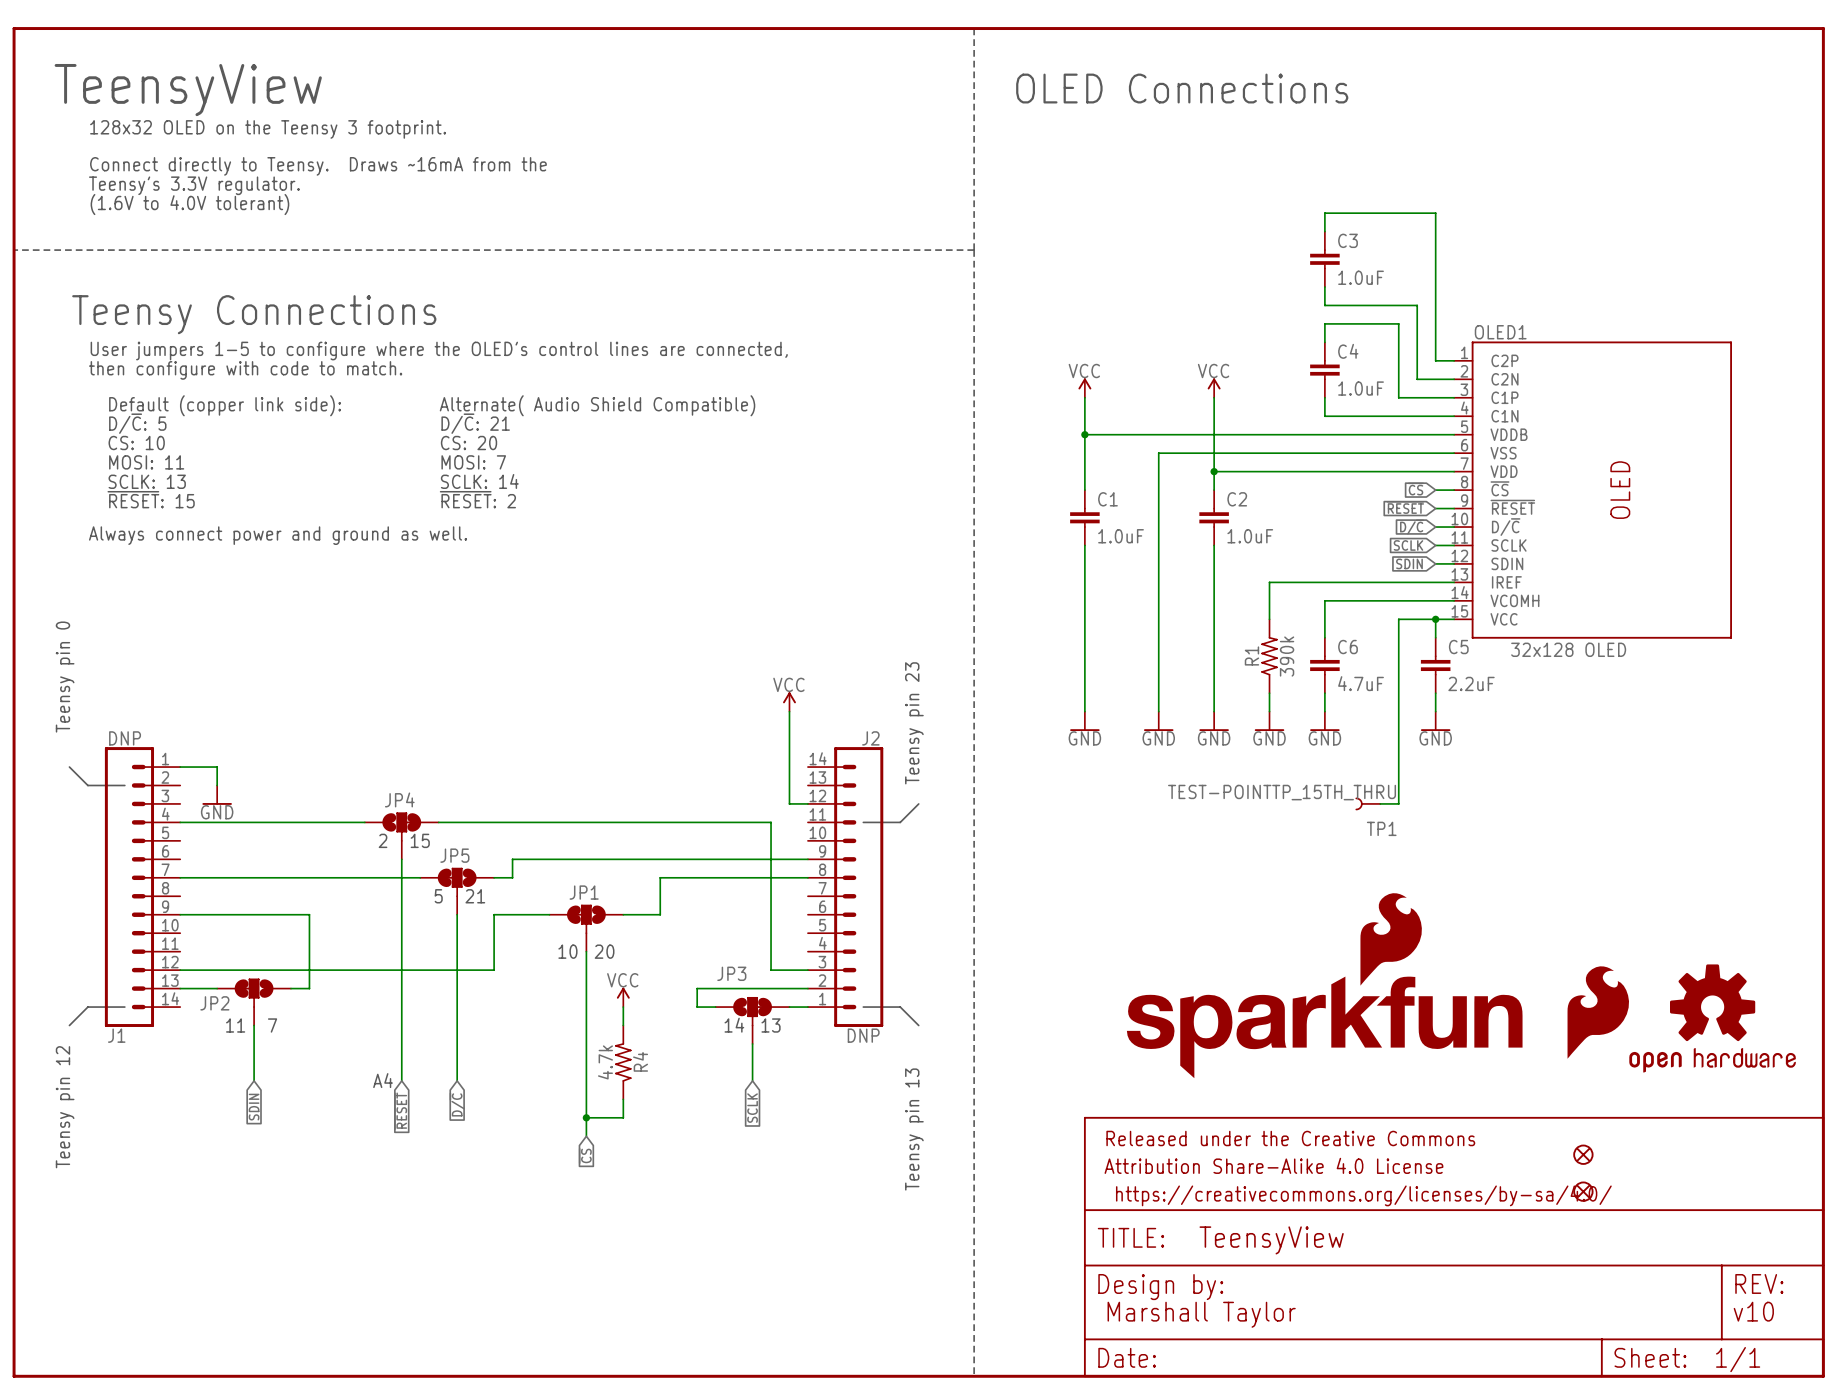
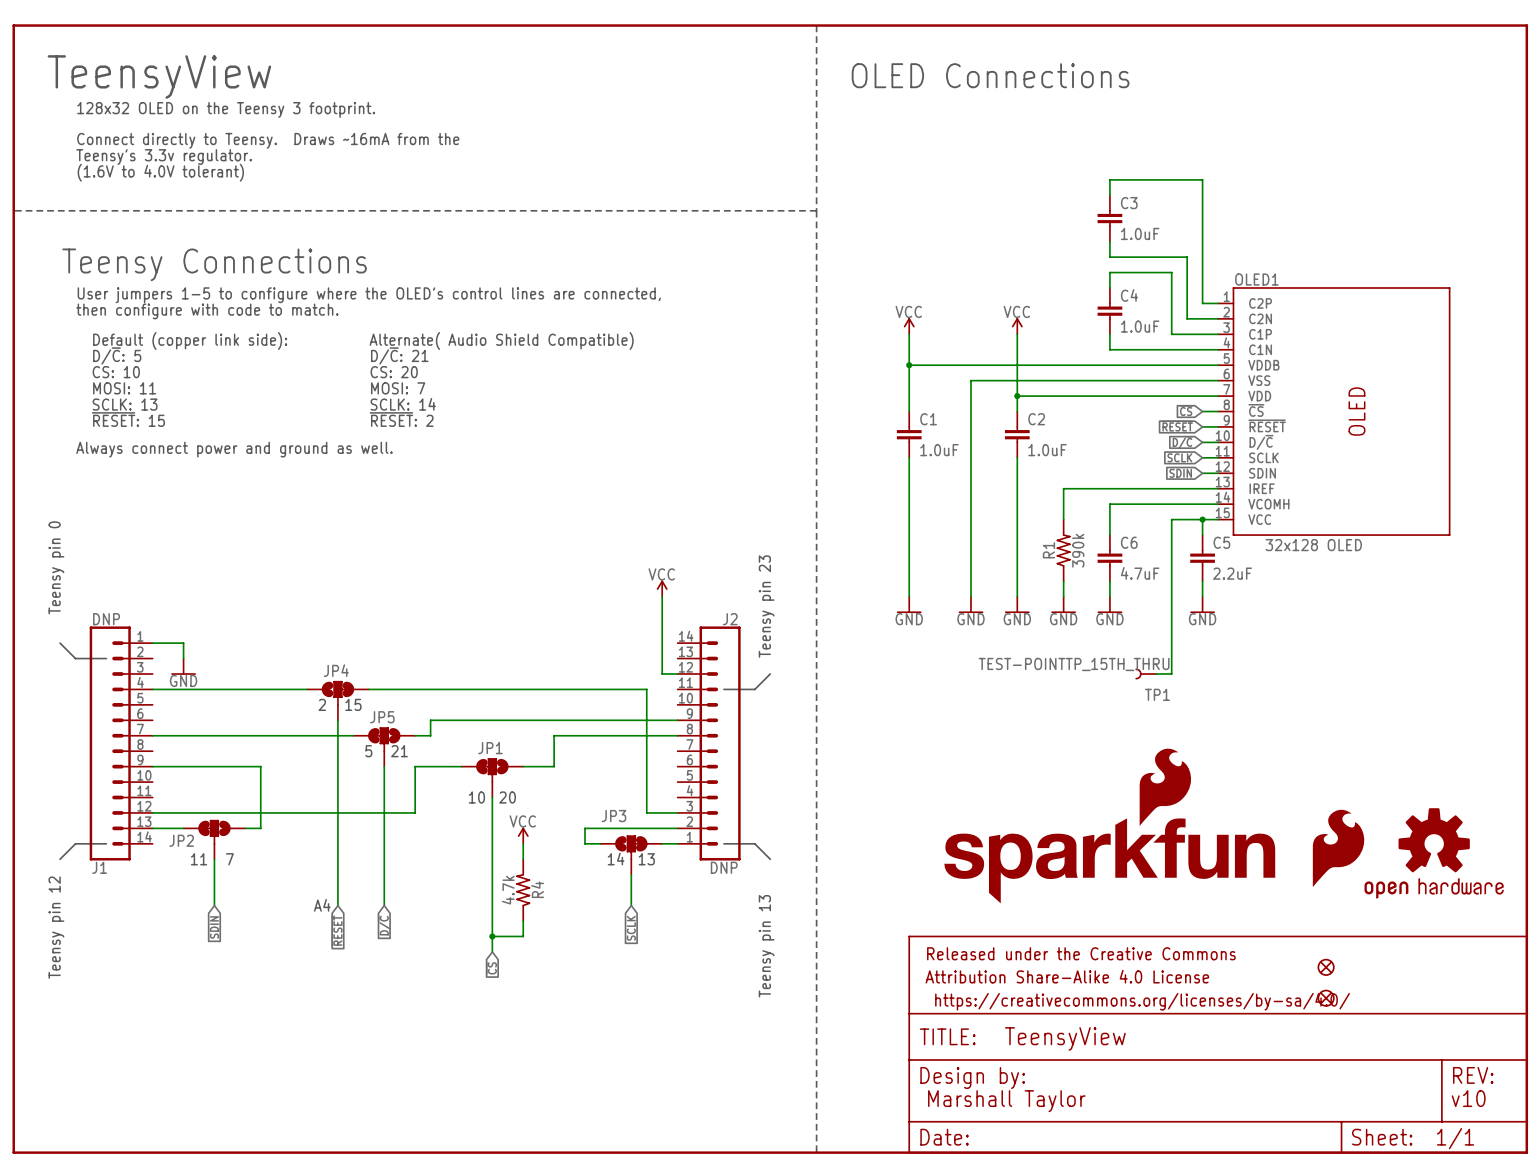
text: Teensy's 3.3V regulator. (194, 185) -> Teensy's 3.3v regulator. (164, 157)

